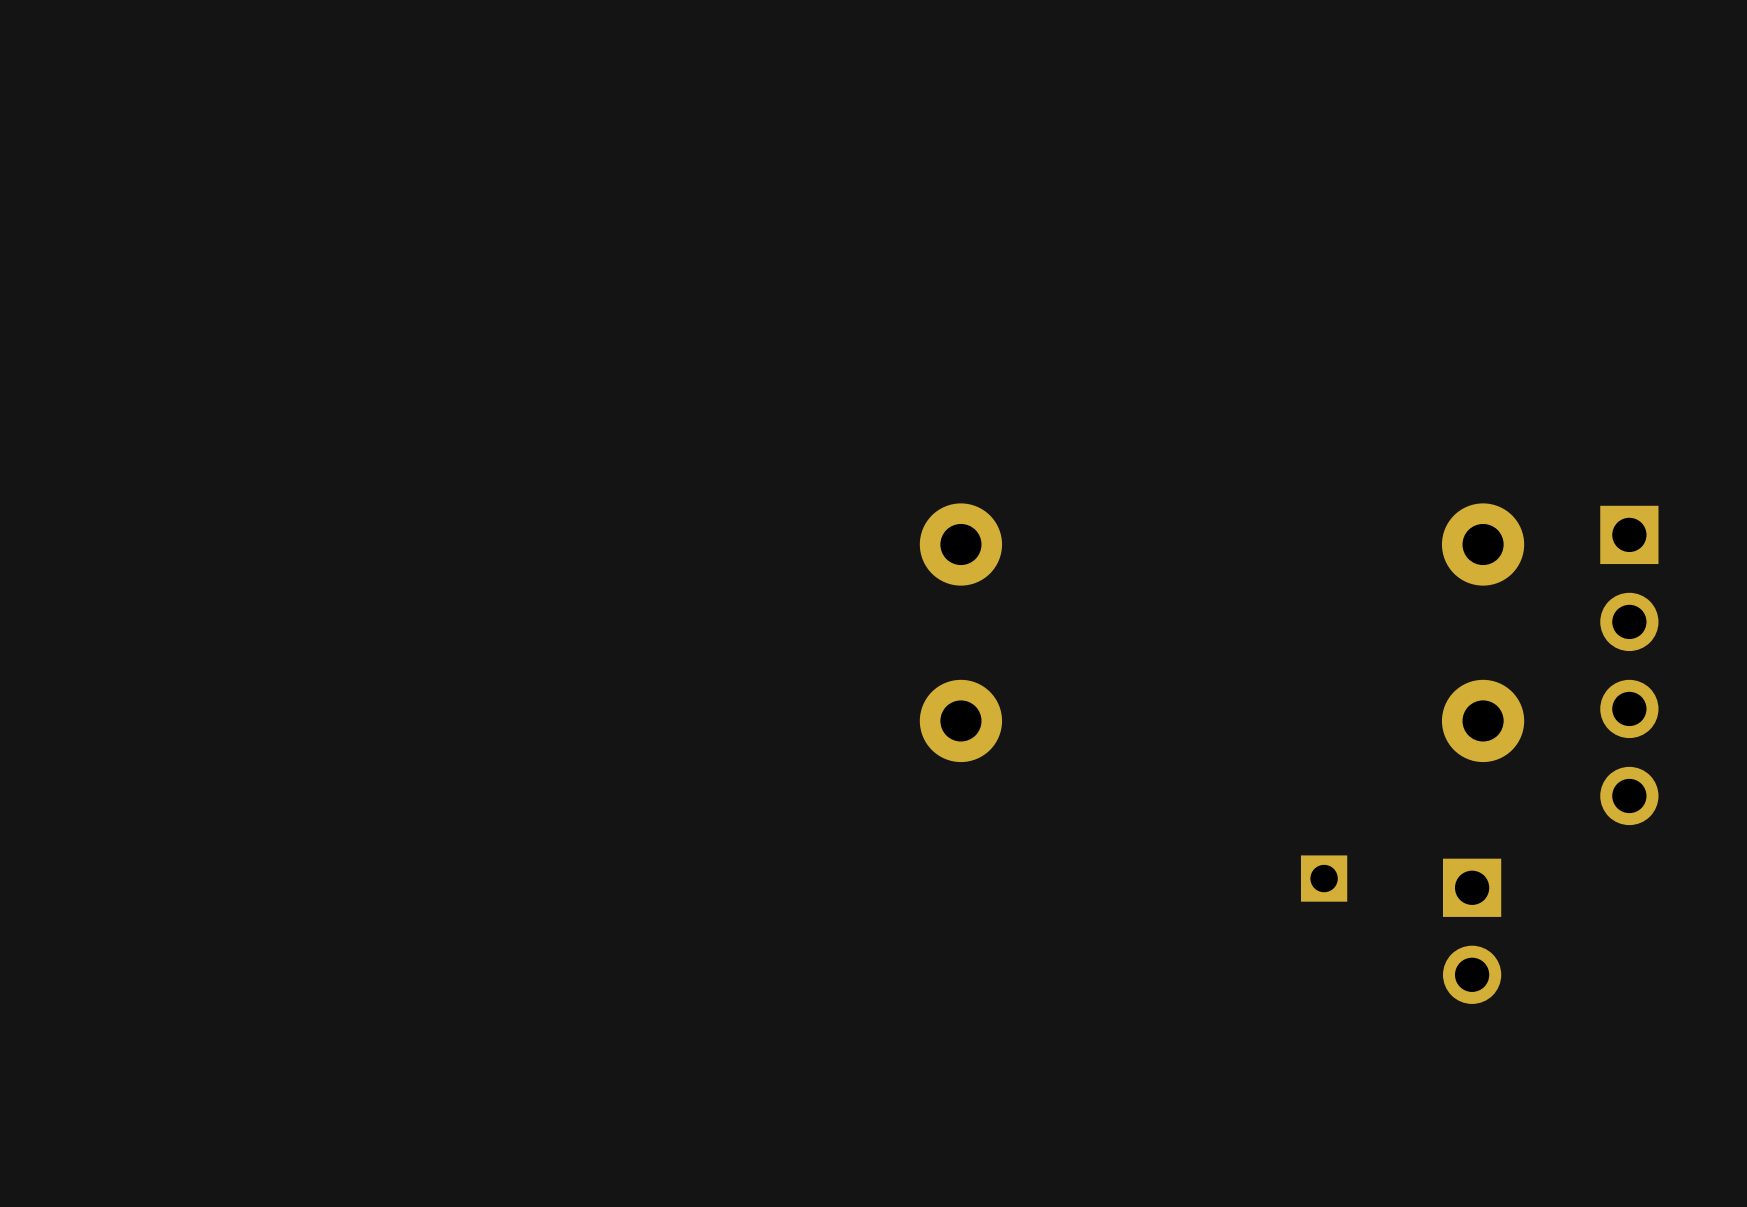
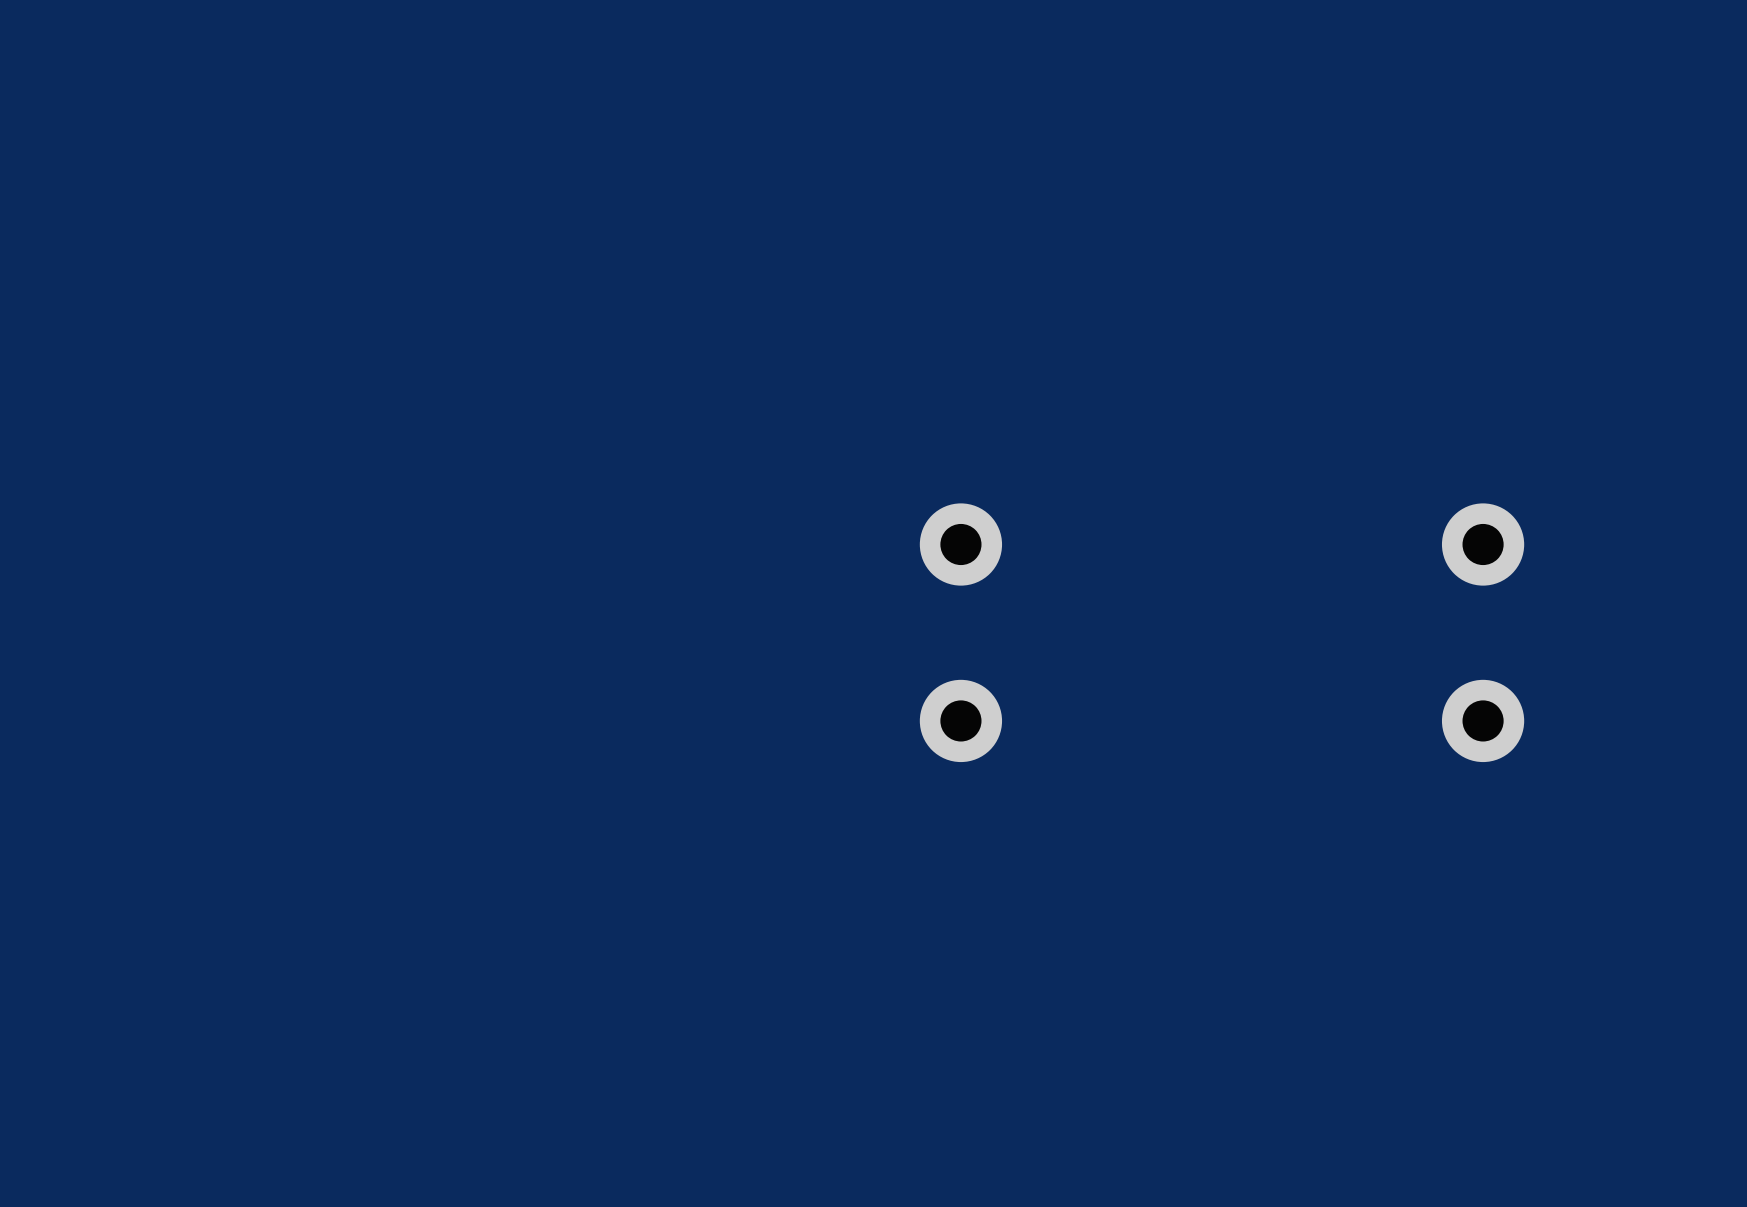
part: (1629, 665) -> none
part: (1324, 878) -> none
part: (1472, 931) -> none

